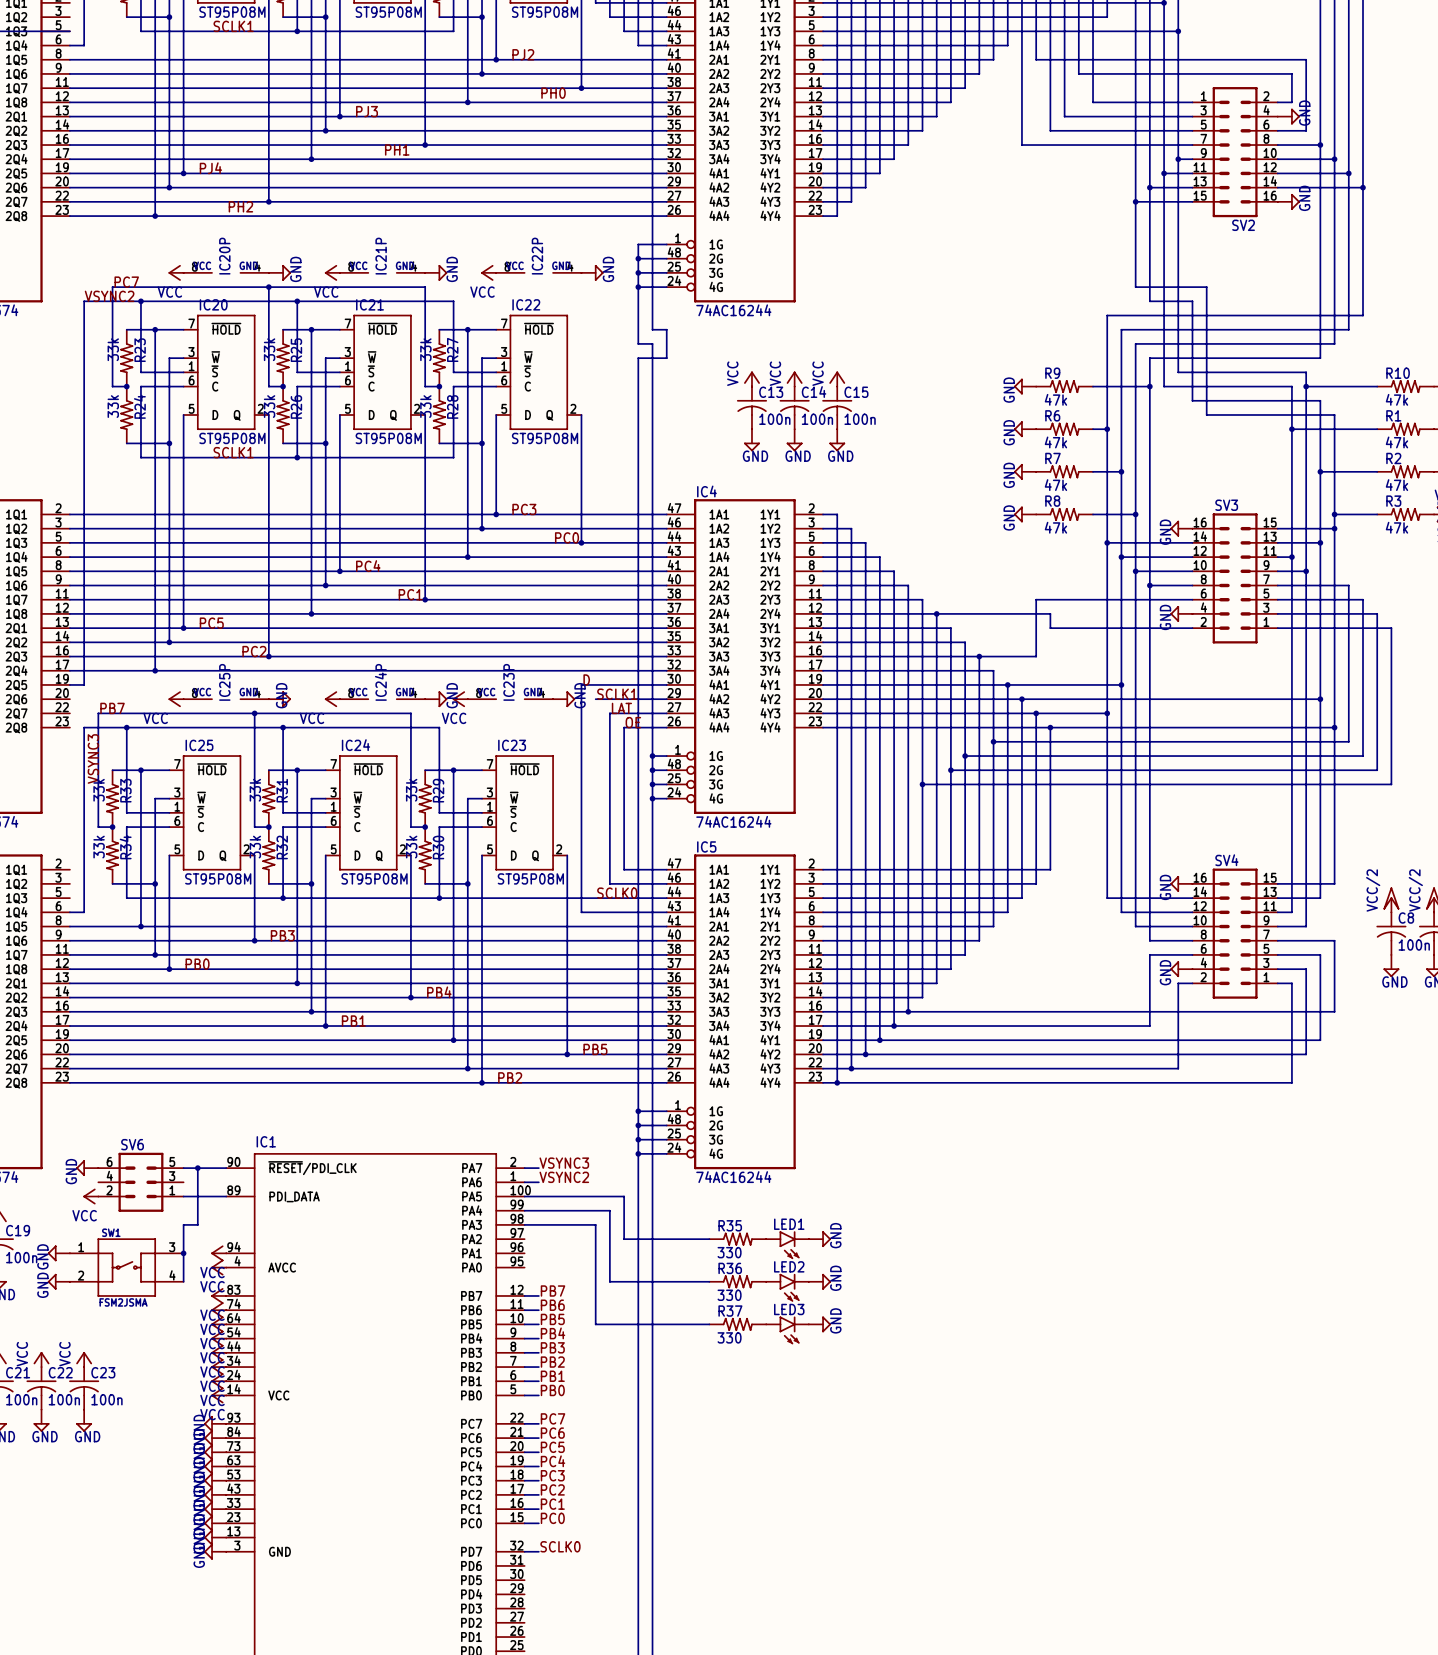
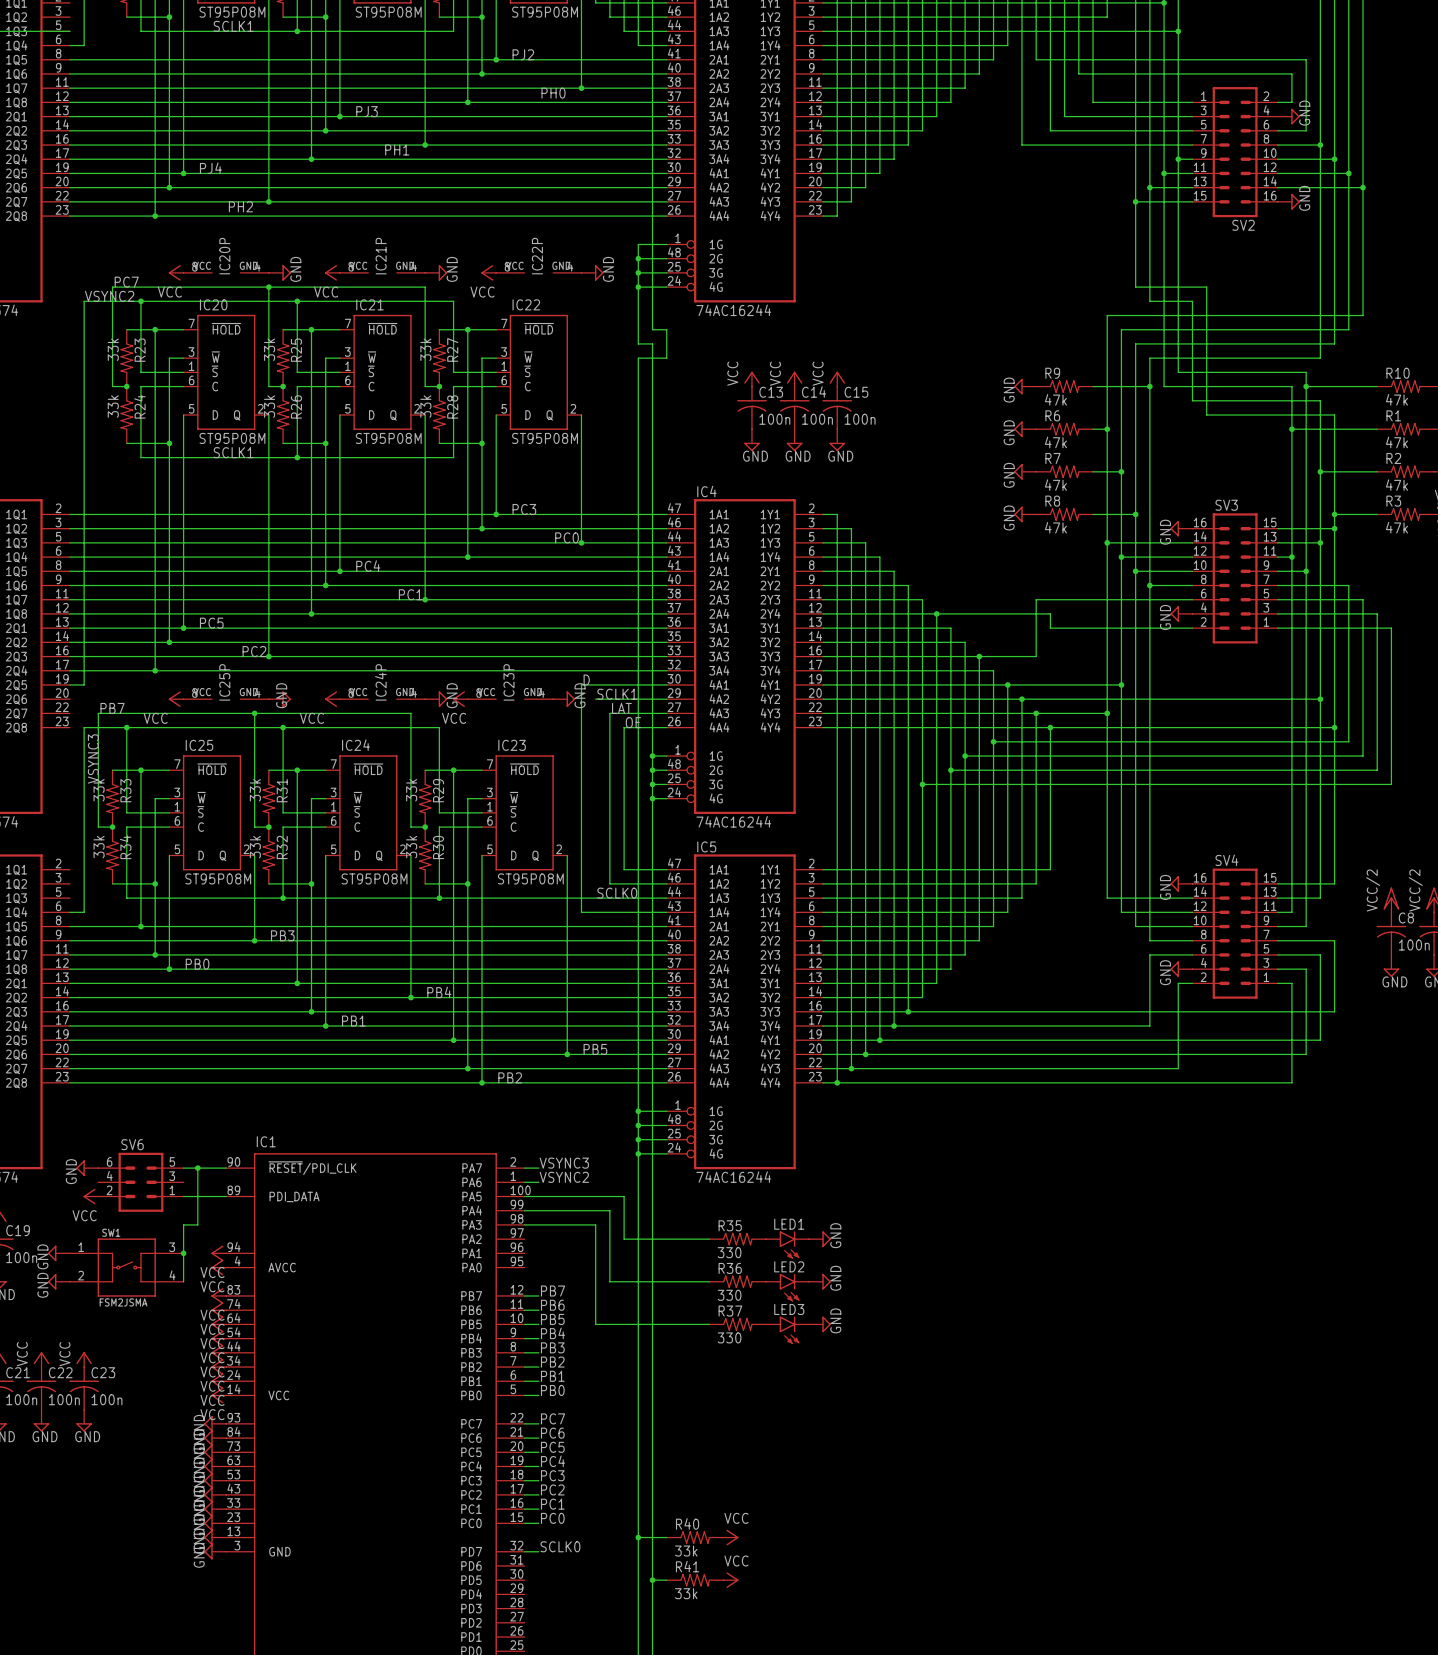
wire: none -> (638, 1537) (666, 1537)
junction: none -> (638, 1537)
R40: none -> 33k (695, 1537)
power symbol: none -> VCC (731, 1537)
wire: none -> (652, 1580) (666, 1580)
junction: none -> (652, 1580)
R41: none -> 33k (695, 1580)
power symbol: none -> VCC (731, 1580)

